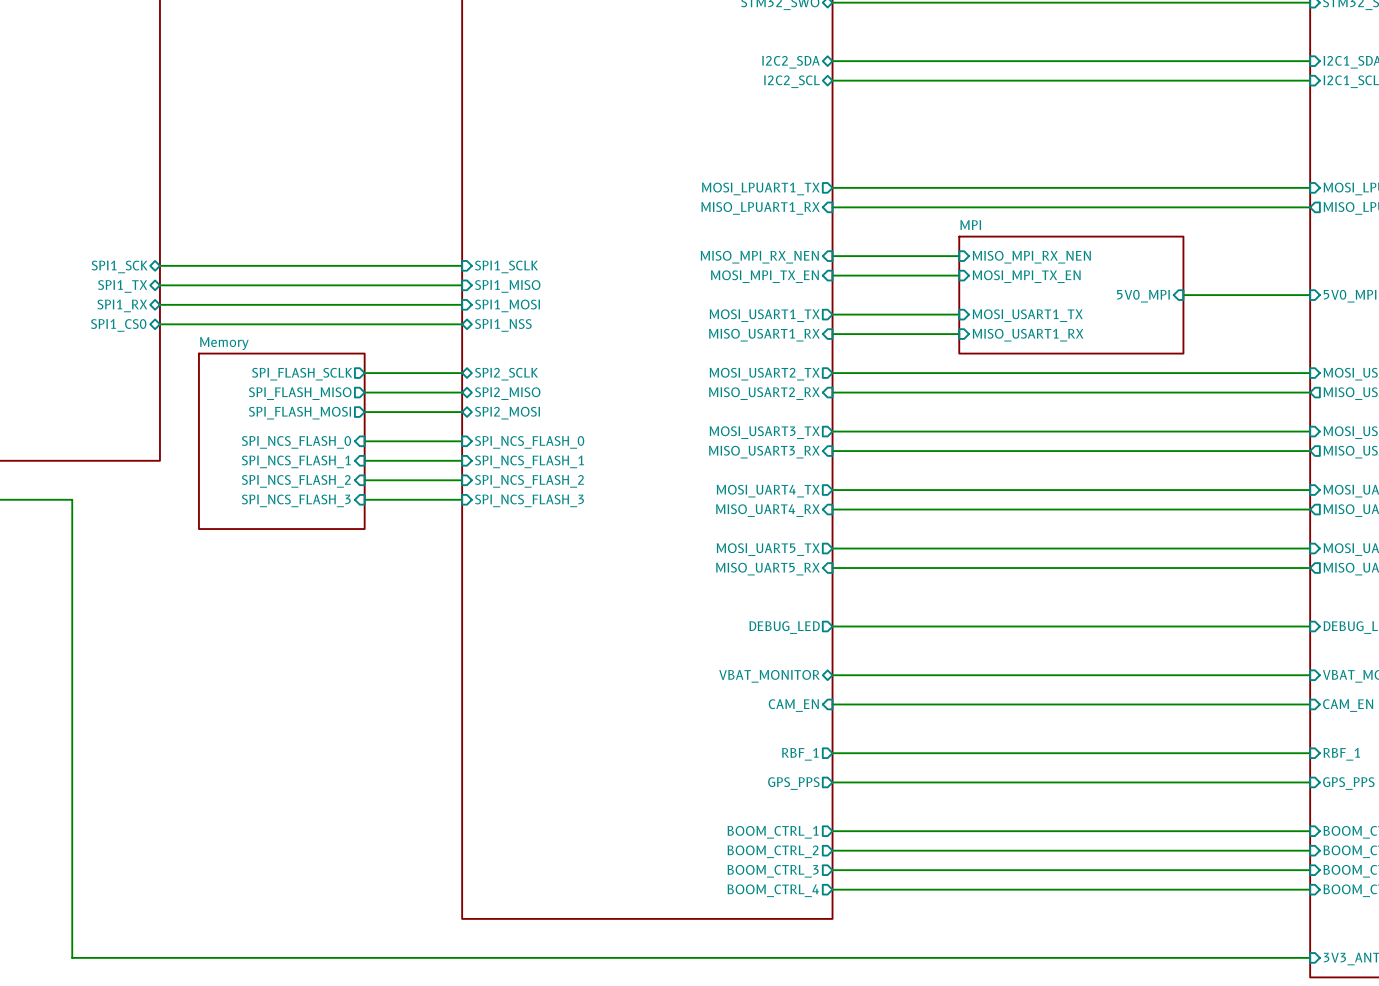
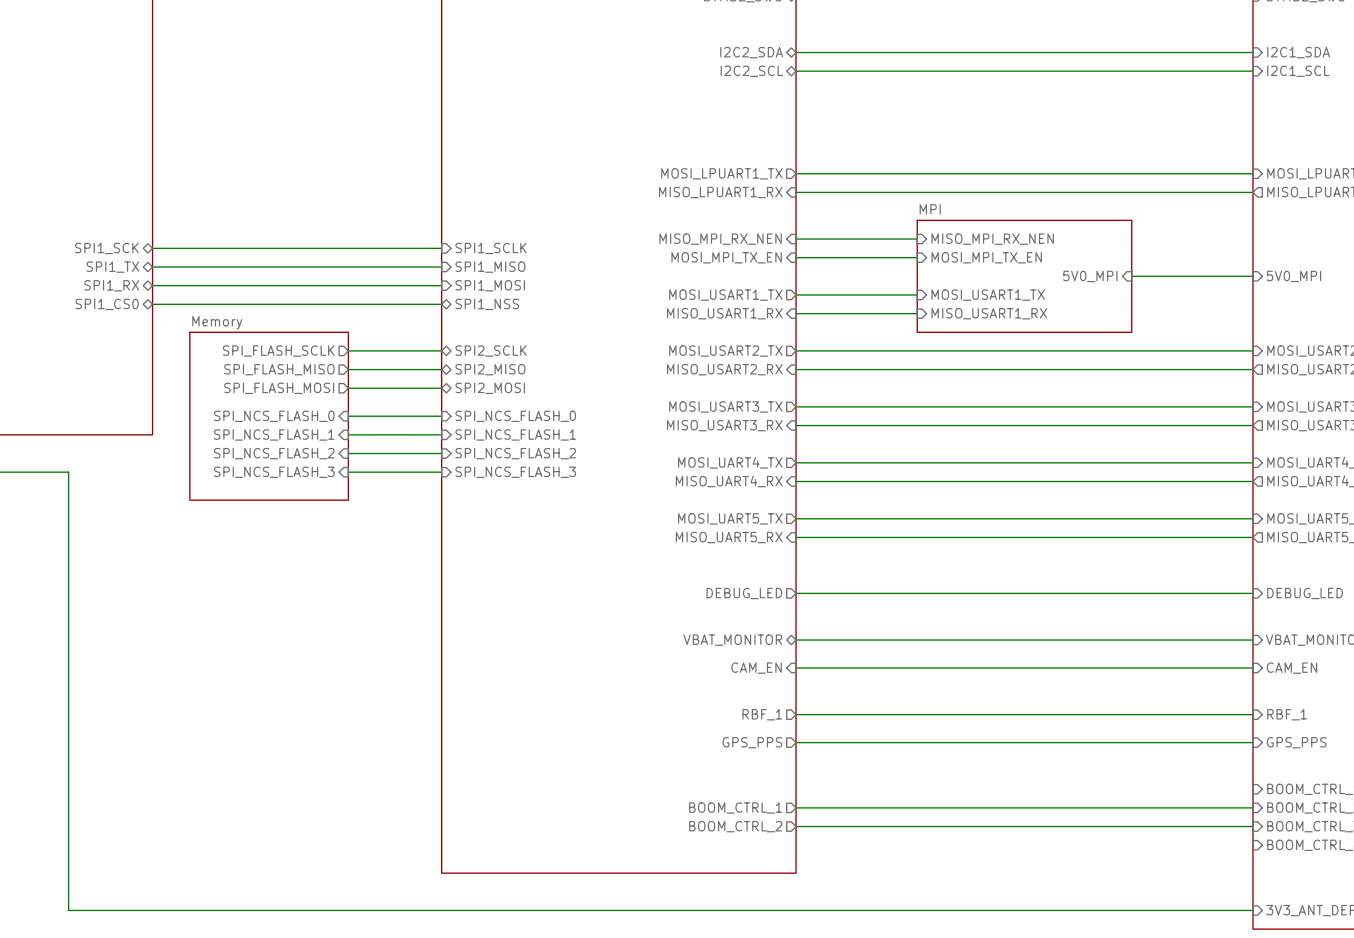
wire: (832, 831) (1310, 831) -> none
sheet pin: BOOM_CTRL_1 (773, 832) -> none
sheet pin: BOOM_CTRL_2 (773, 851) -> BOOM_CTRL_1 (735, 807)
sheet pin: BOOM_CTRL_3 (773, 871) -> BOOM_CTRL_2 (735, 826)
wire: (832, 889) (1310, 889) -> none
sheet pin: BOOM_CTRL_4 (773, 890) -> none

